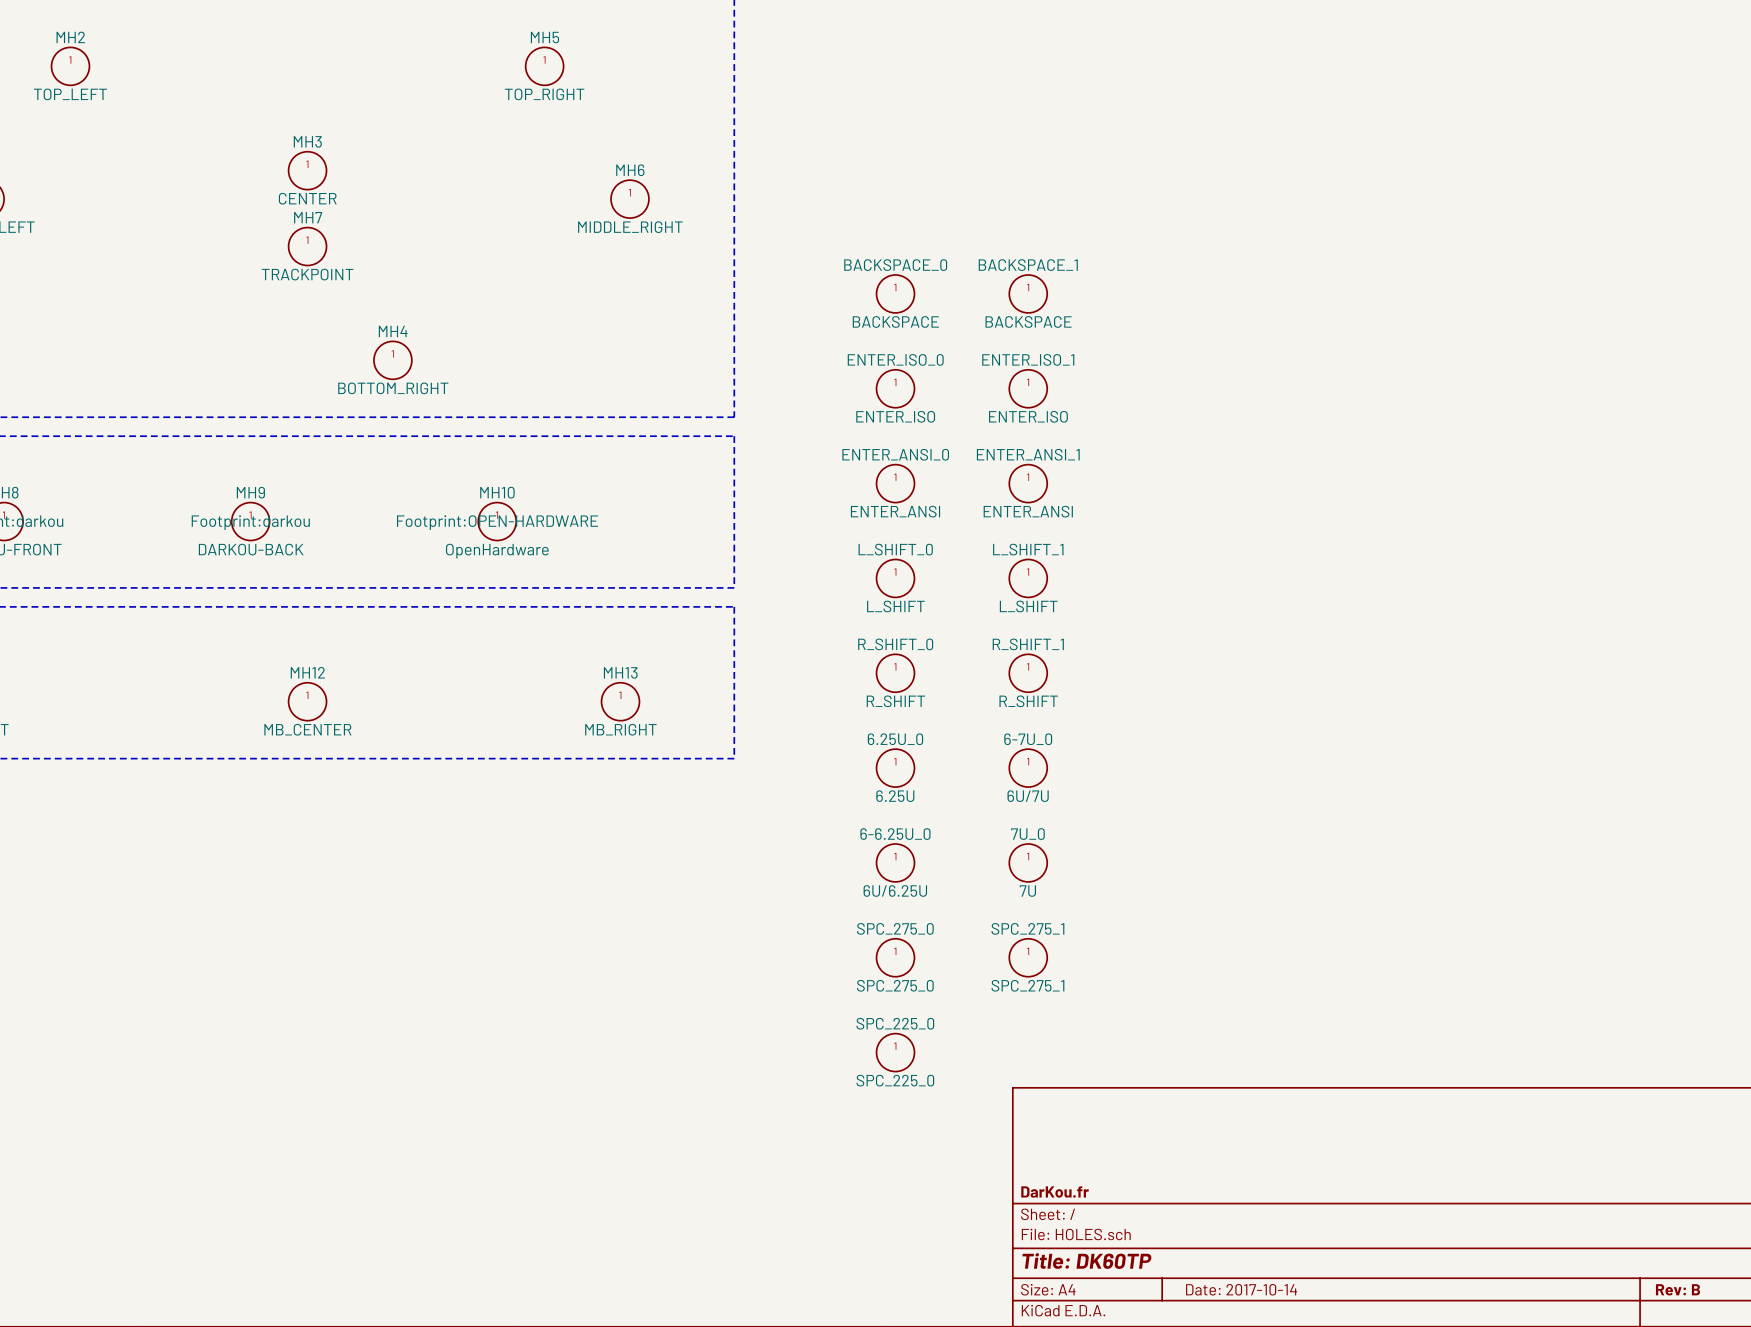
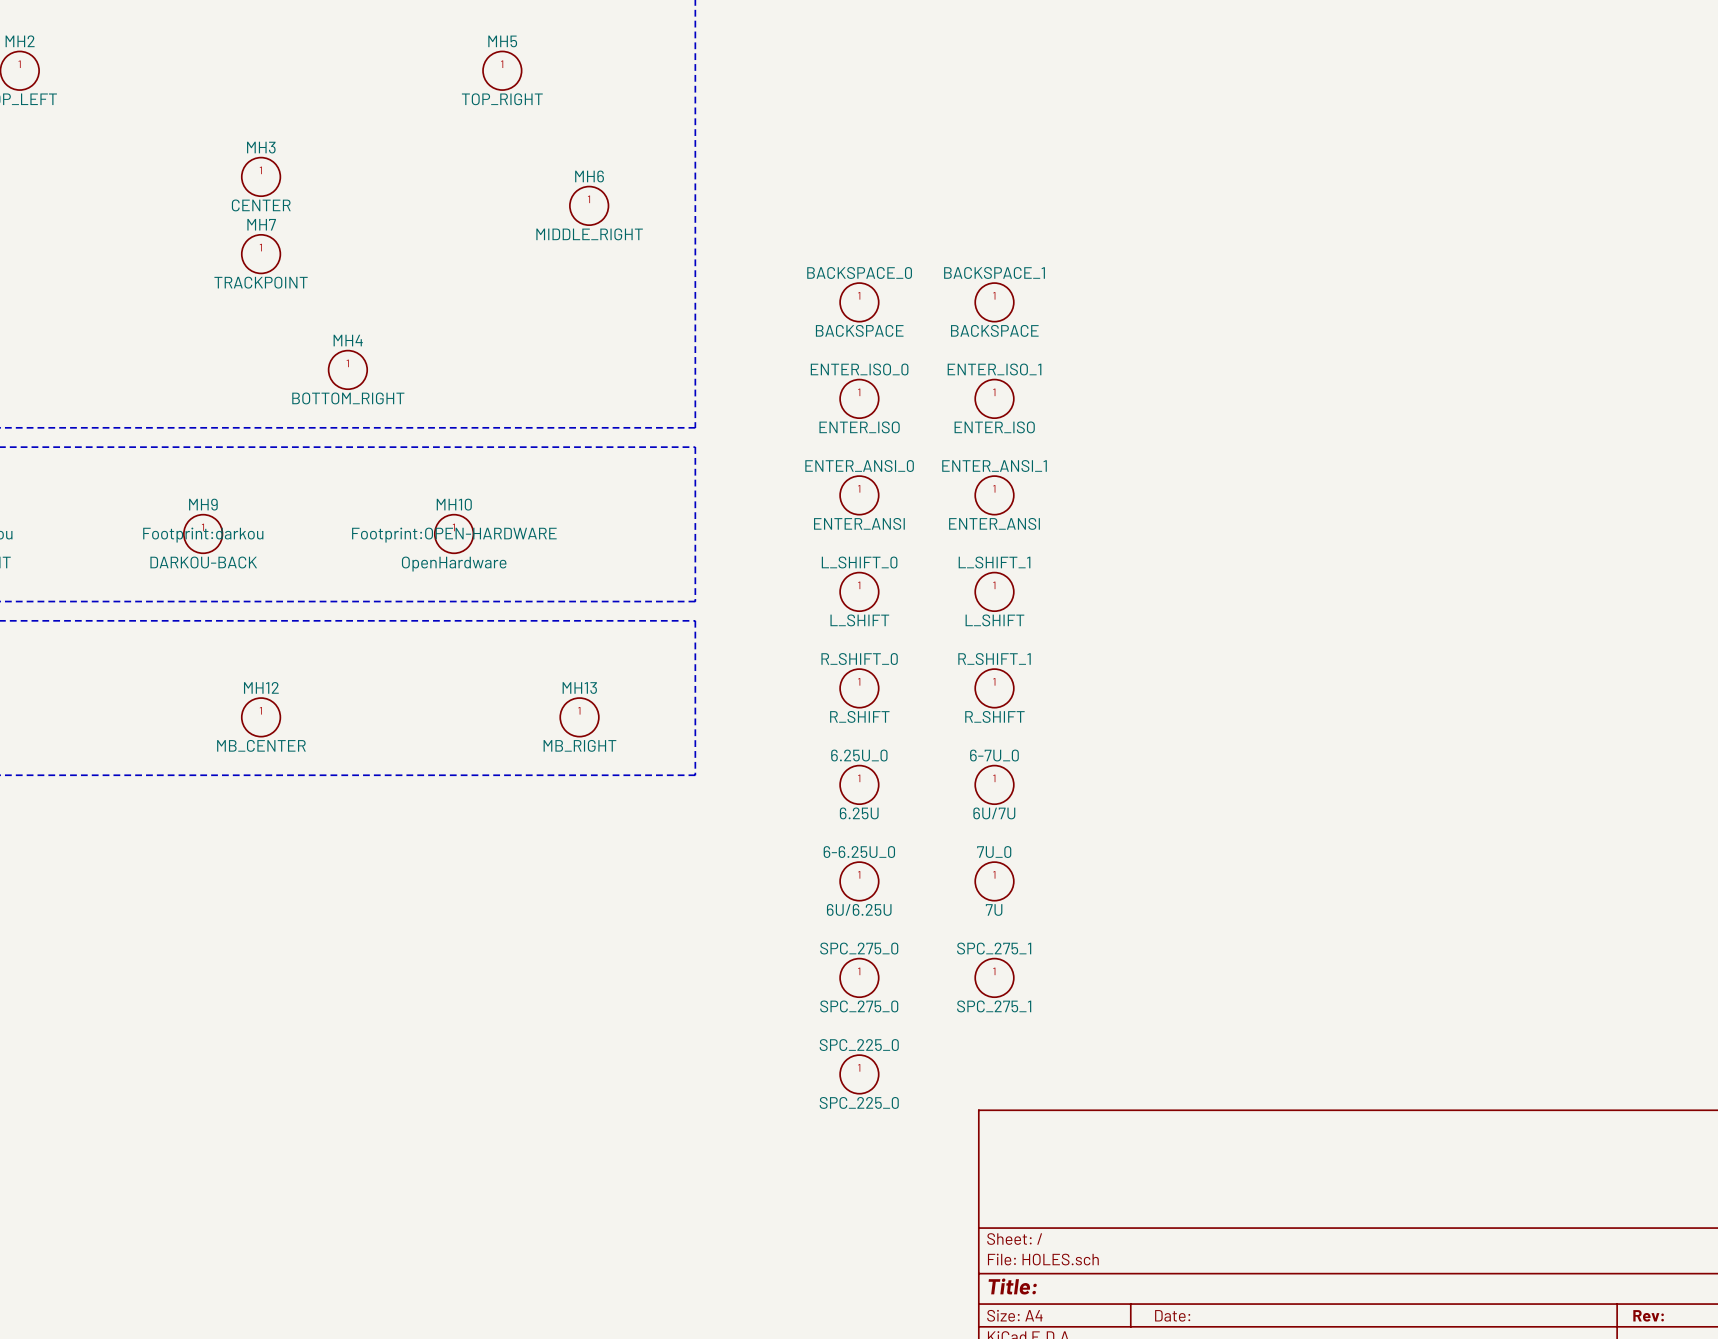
title block: DarKou.fr (1055, 1191) -> none
title block: Title: DK60TP (1086, 1261) -> Title: (1012, 1286)
title block: Date: 2017-10-14 (1241, 1289) -> Date: (1172, 1315)
title block: Rev: B (1678, 1289) -> Rev: (1648, 1315)

